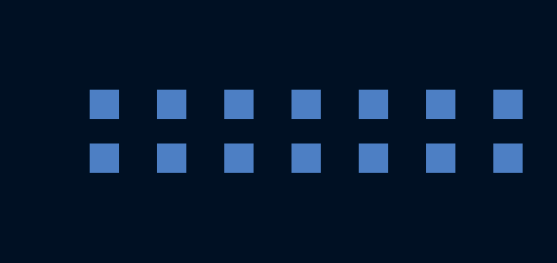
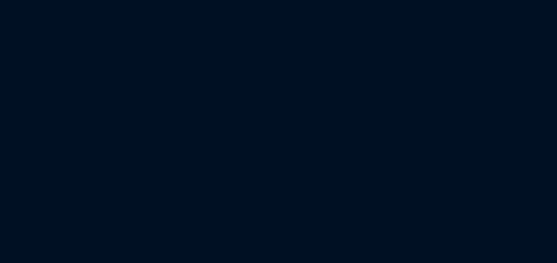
part: (104, 131) -> none
part: (171, 131) -> none
part: (238, 131) -> none
part: (306, 131) -> none
part: (373, 131) -> none
part: (440, 131) -> none
part: (507, 131) -> none

